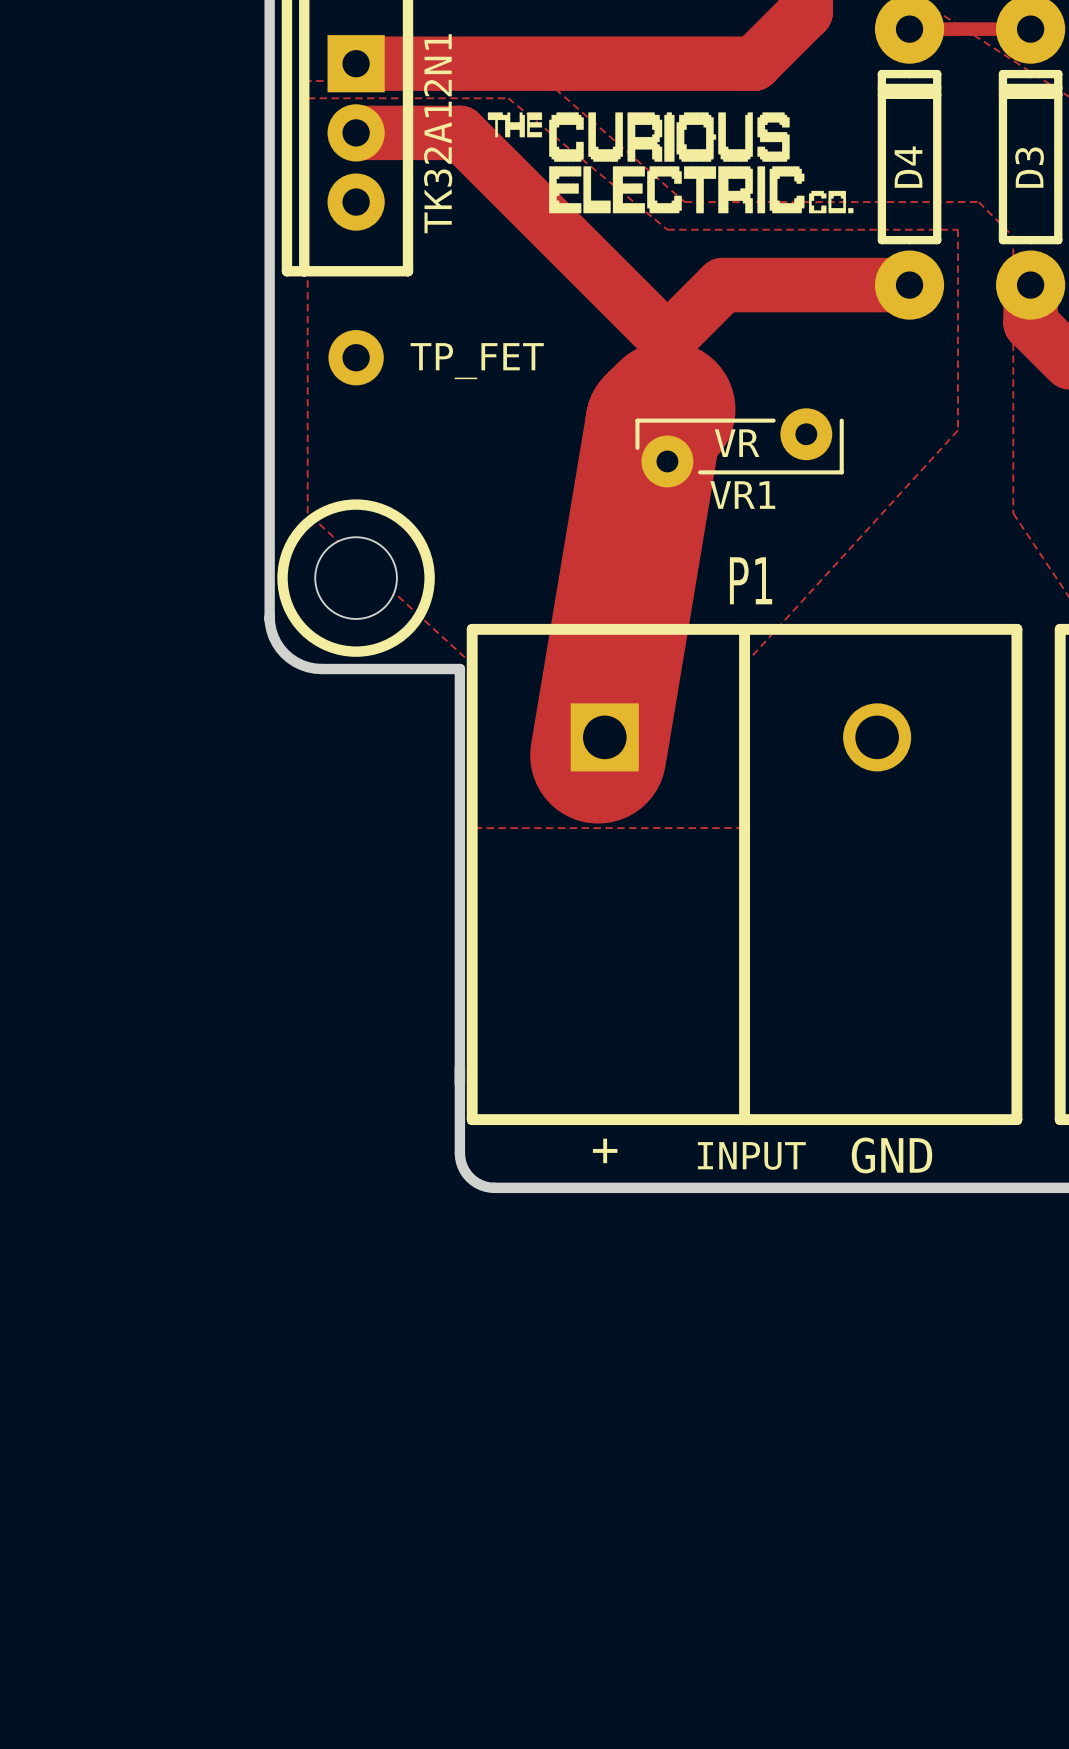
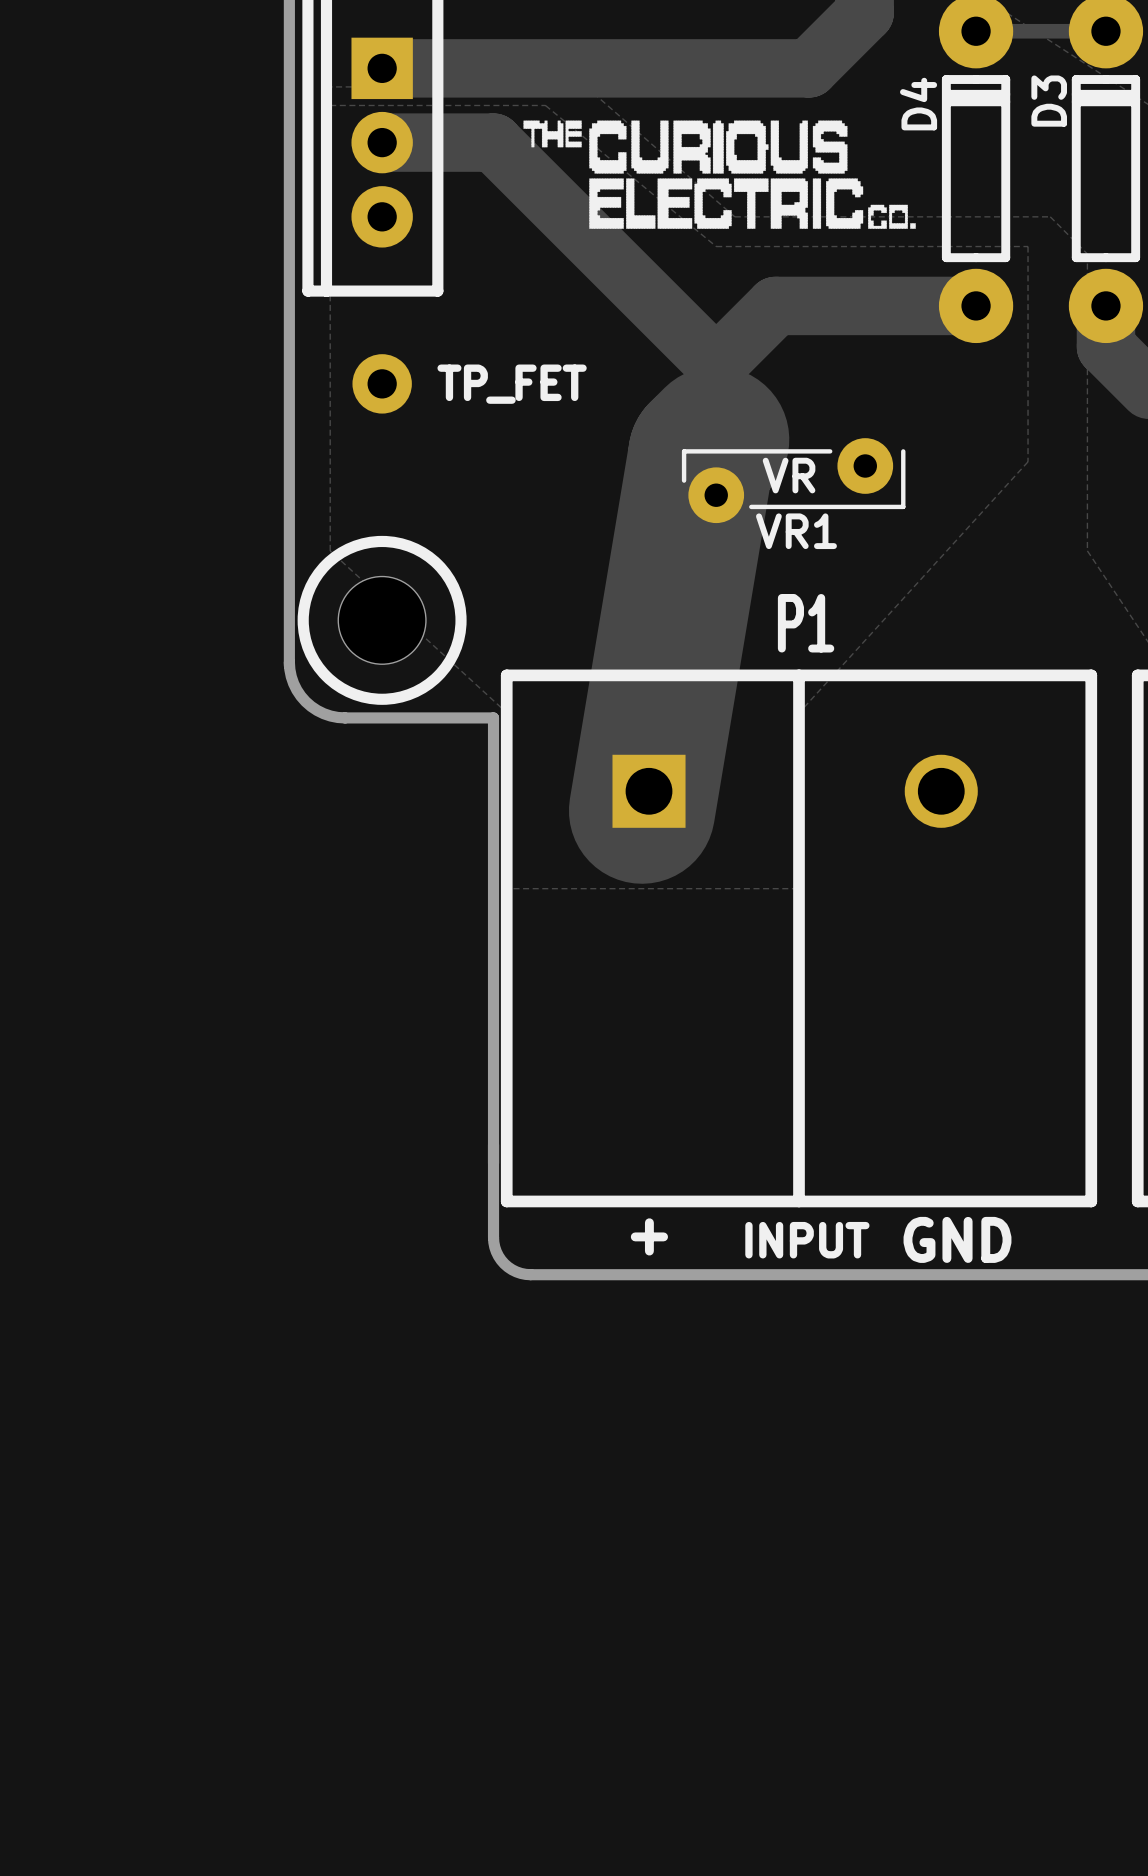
part value: TK32A12N1 (438, 133) -> none
D4 name position: D4 (908, 167) -> D4 (918, 104)
D3 name position: D3 (1029, 167) -> D3 (1049, 101)

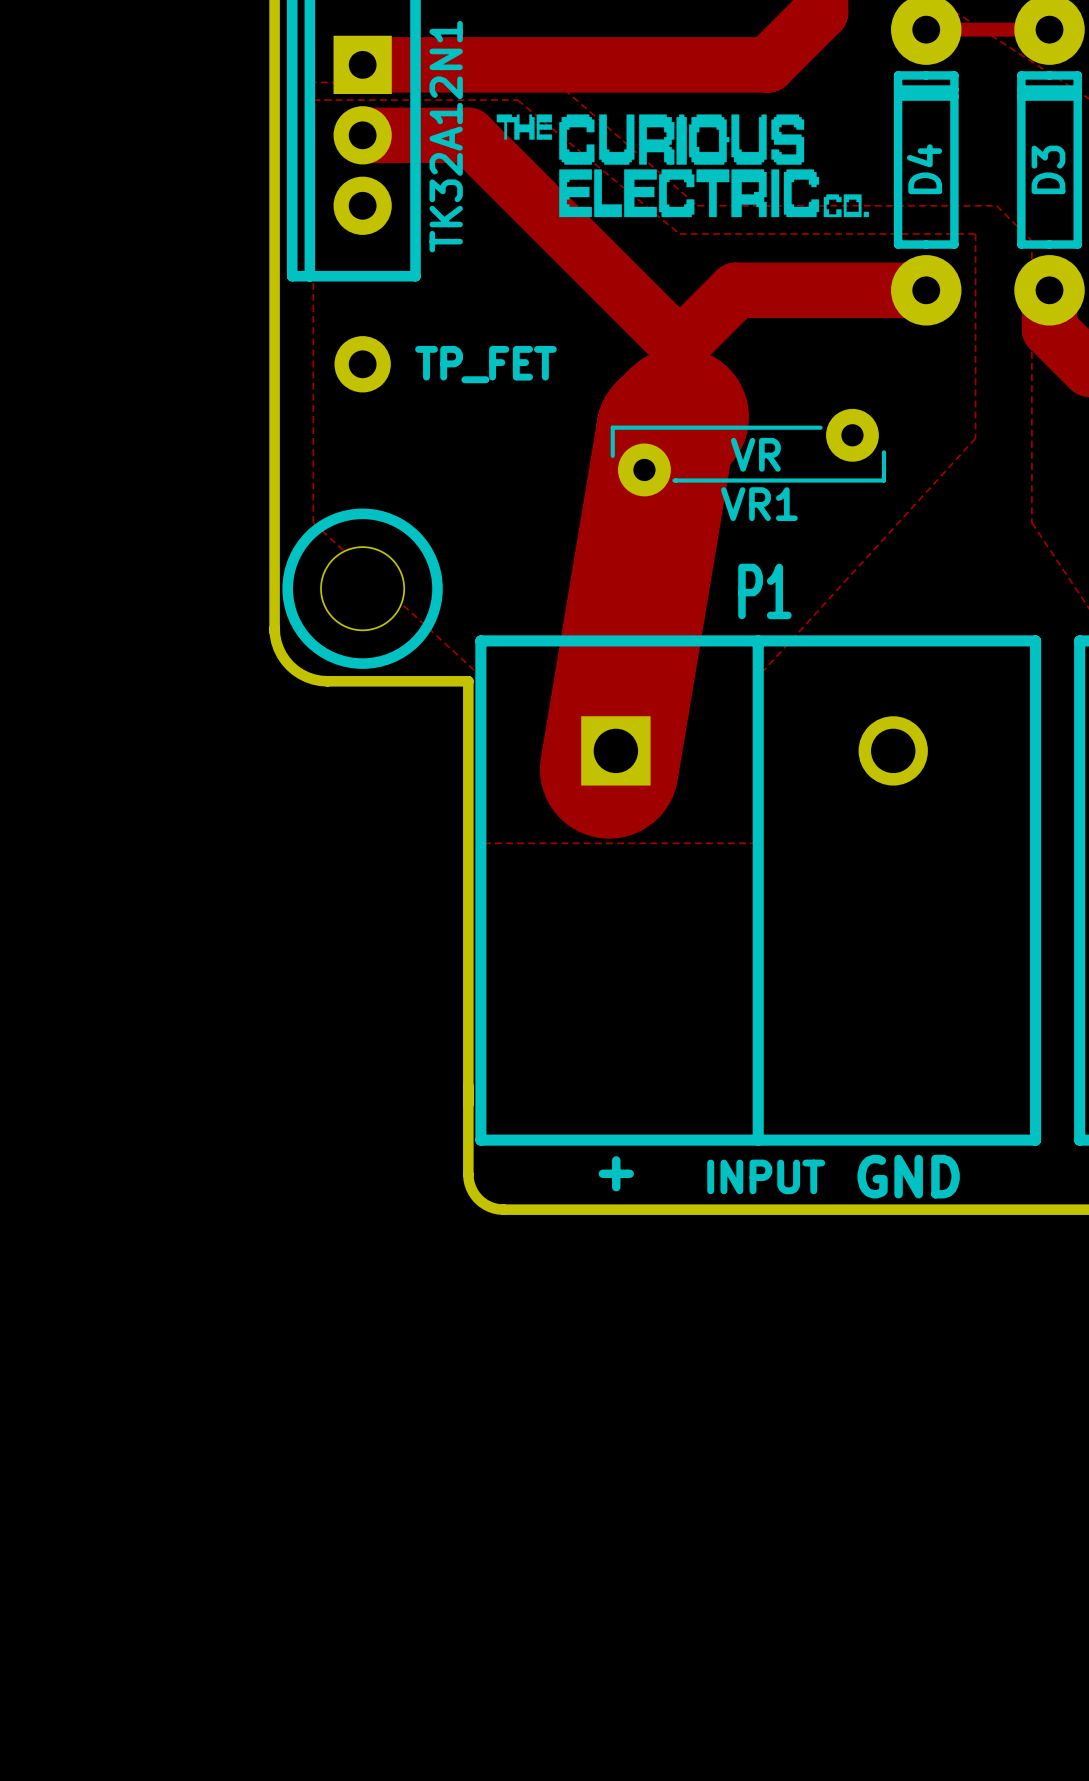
D3 name position: D3 (1049, 101) -> D3 (1048, 169)
D4 name position: D4 (918, 104) -> D4 (924, 169)
part value: none -> TK32A12N1 (446, 136)
VR1 footprint: [681, 438, 906, 524] -> [610, 408, 887, 497]

